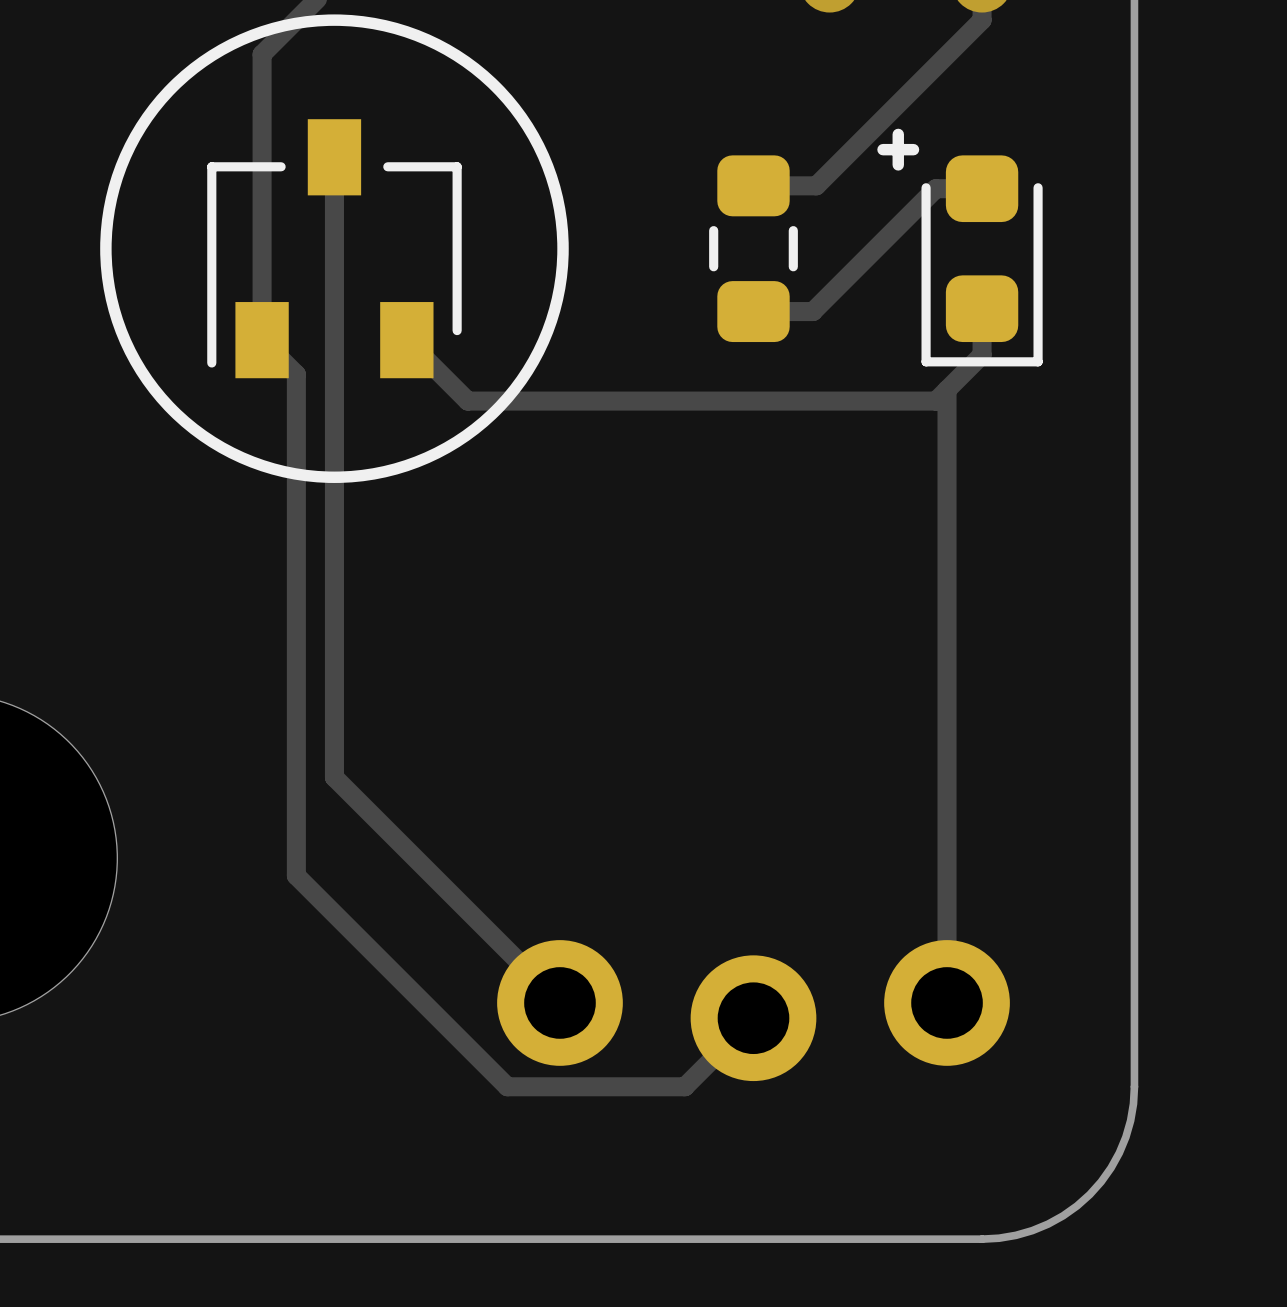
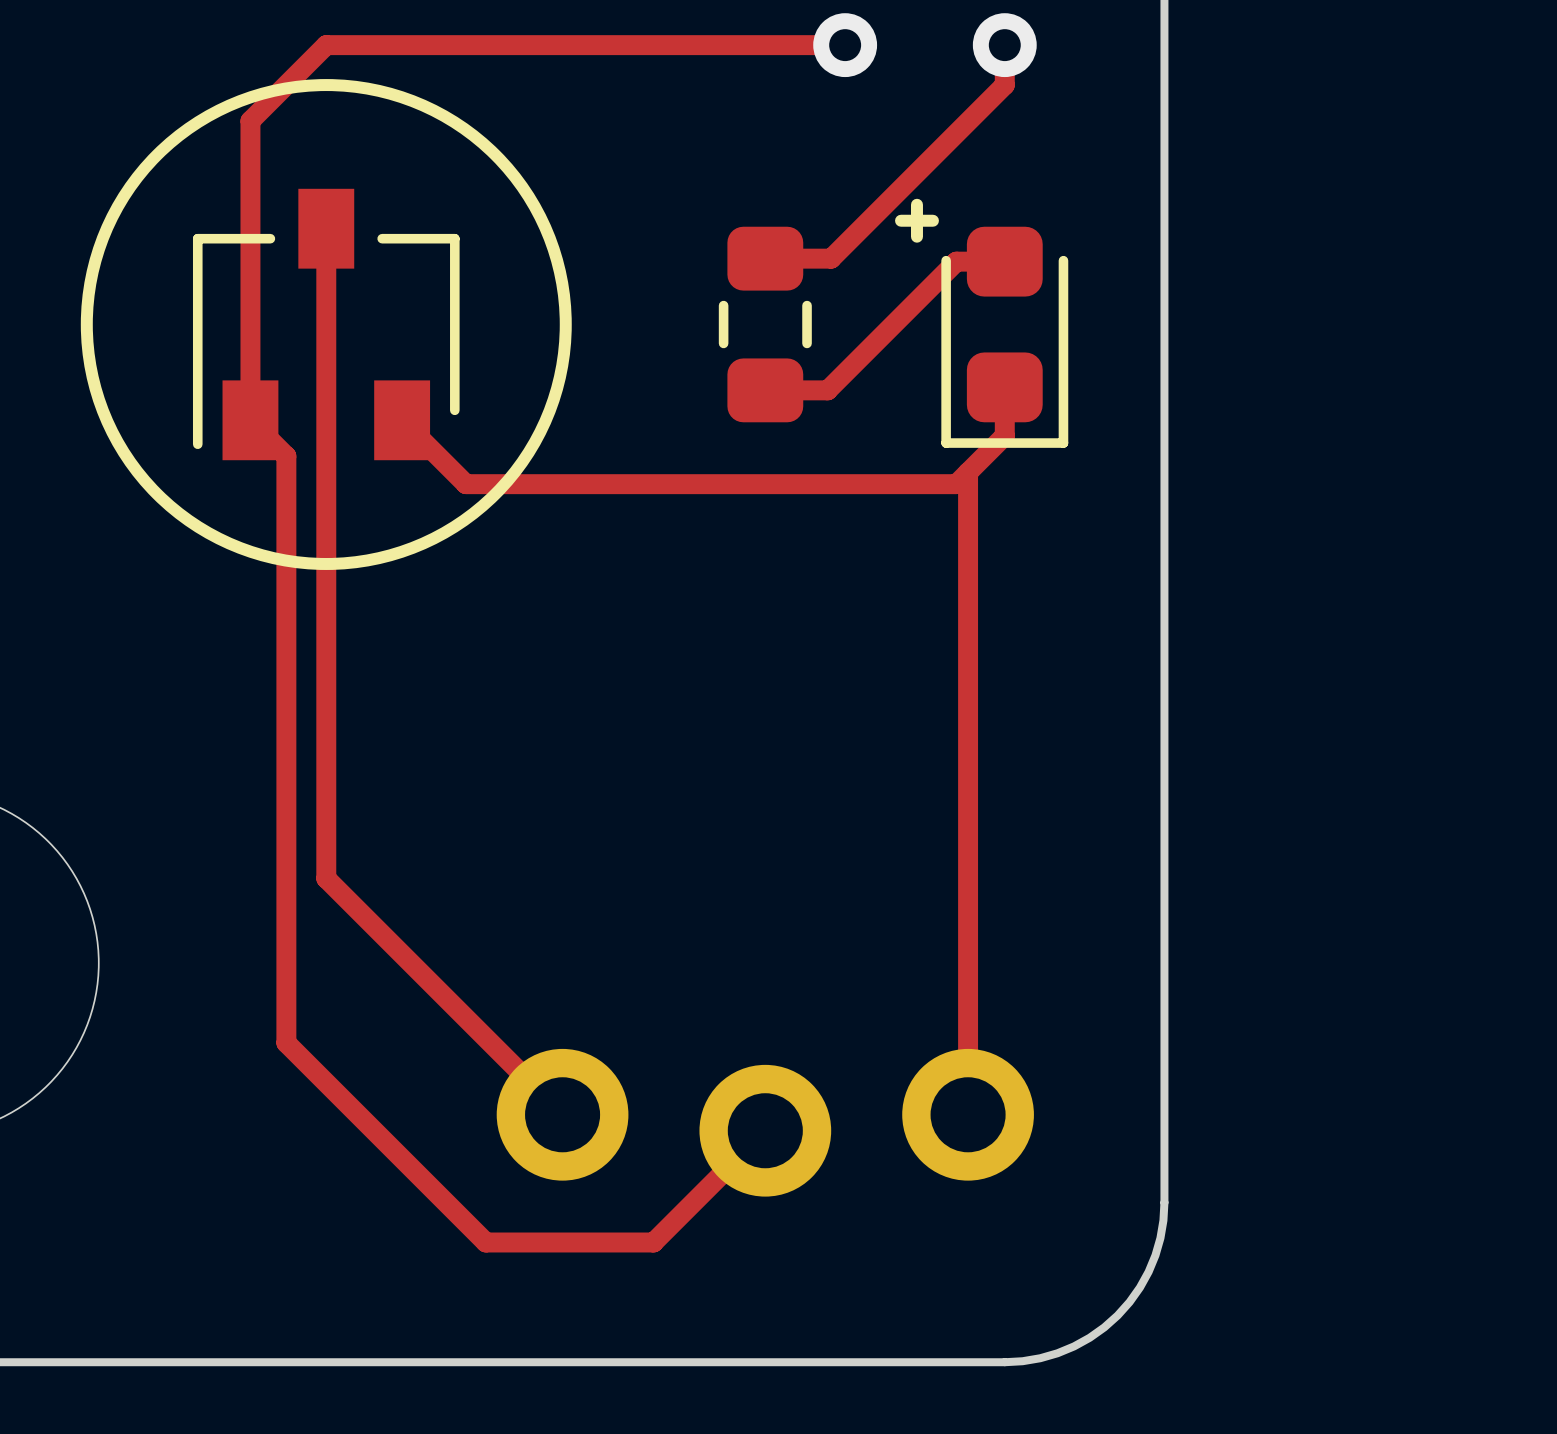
track: (296, 875) (507, 1086) (684, 1086) -> (286, 981) (286, 1042) (485, 1242) (653, 1242) (693, 1202)

